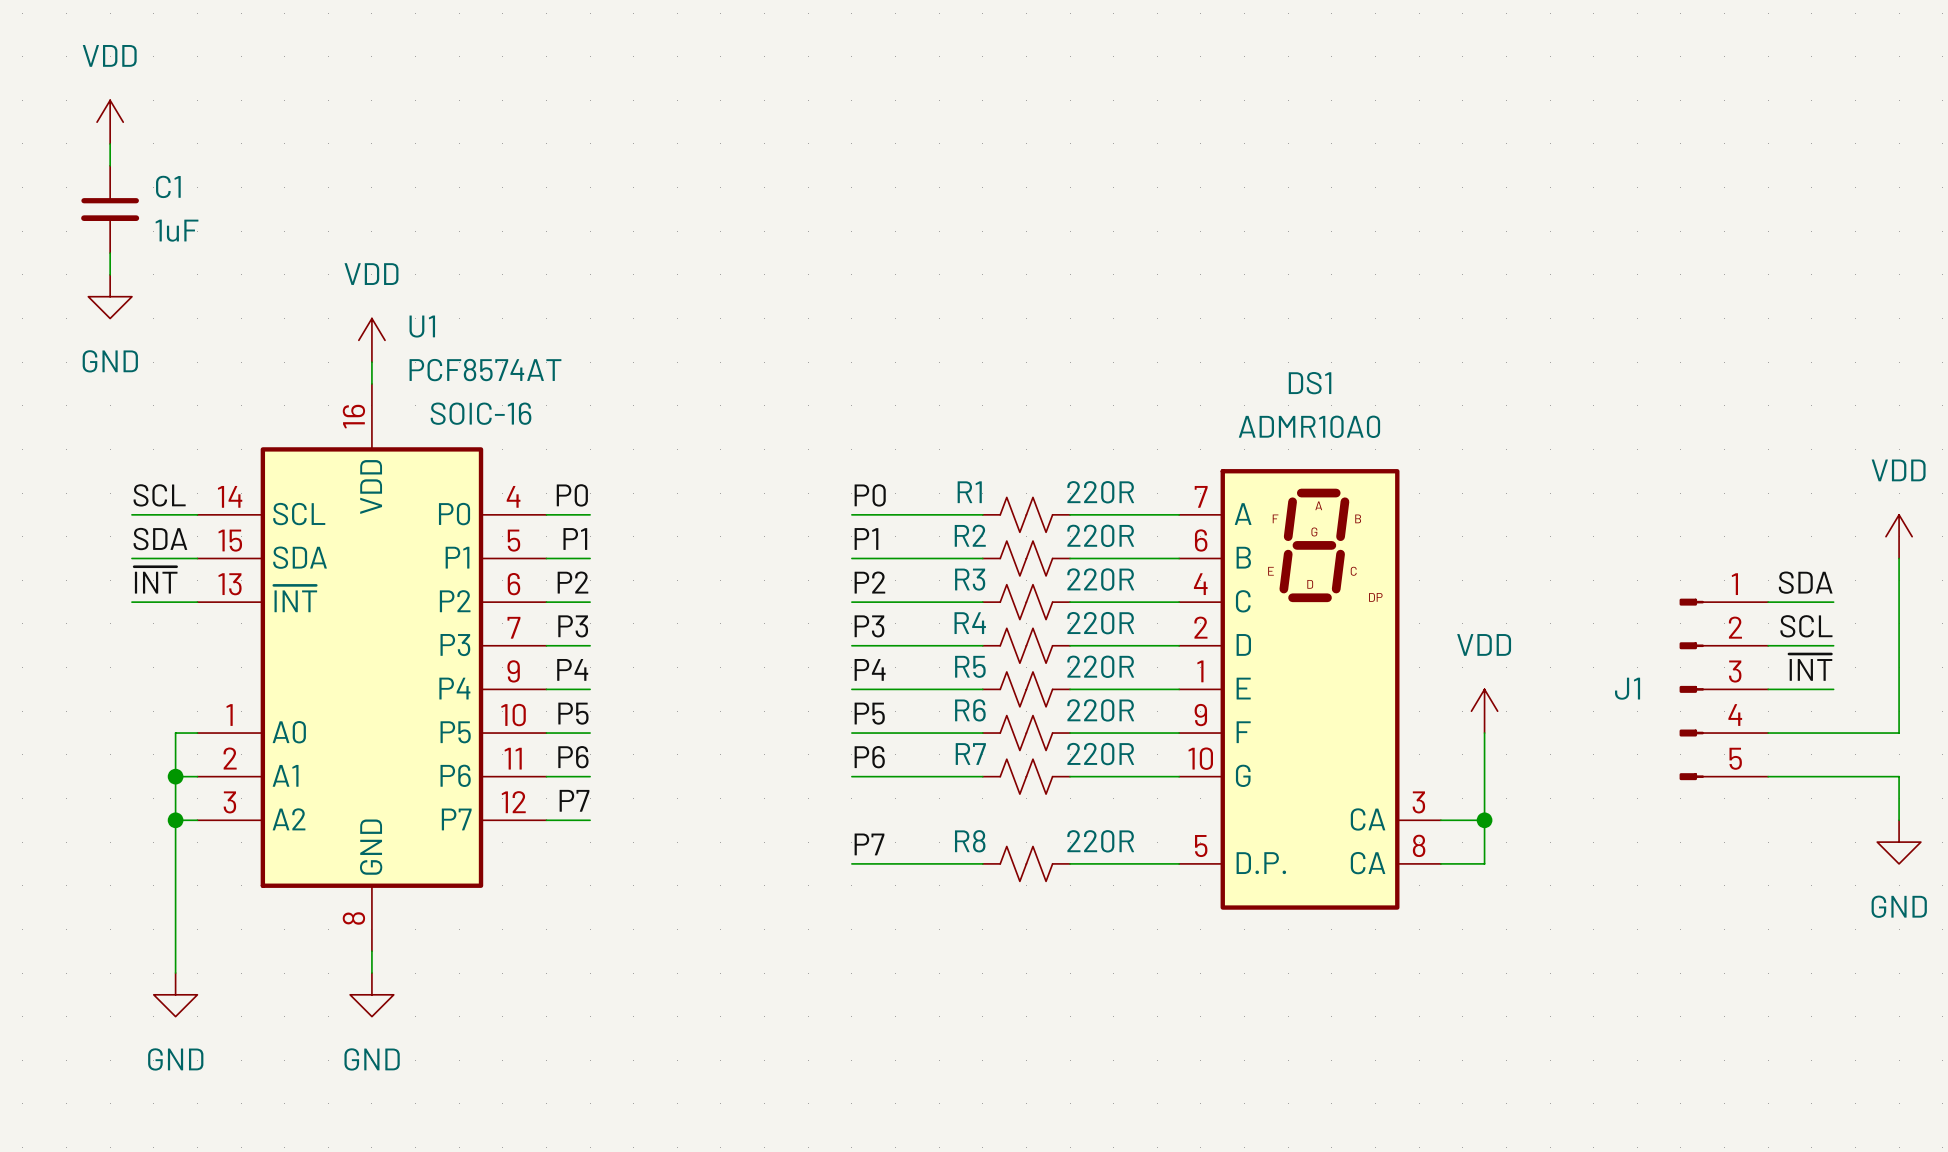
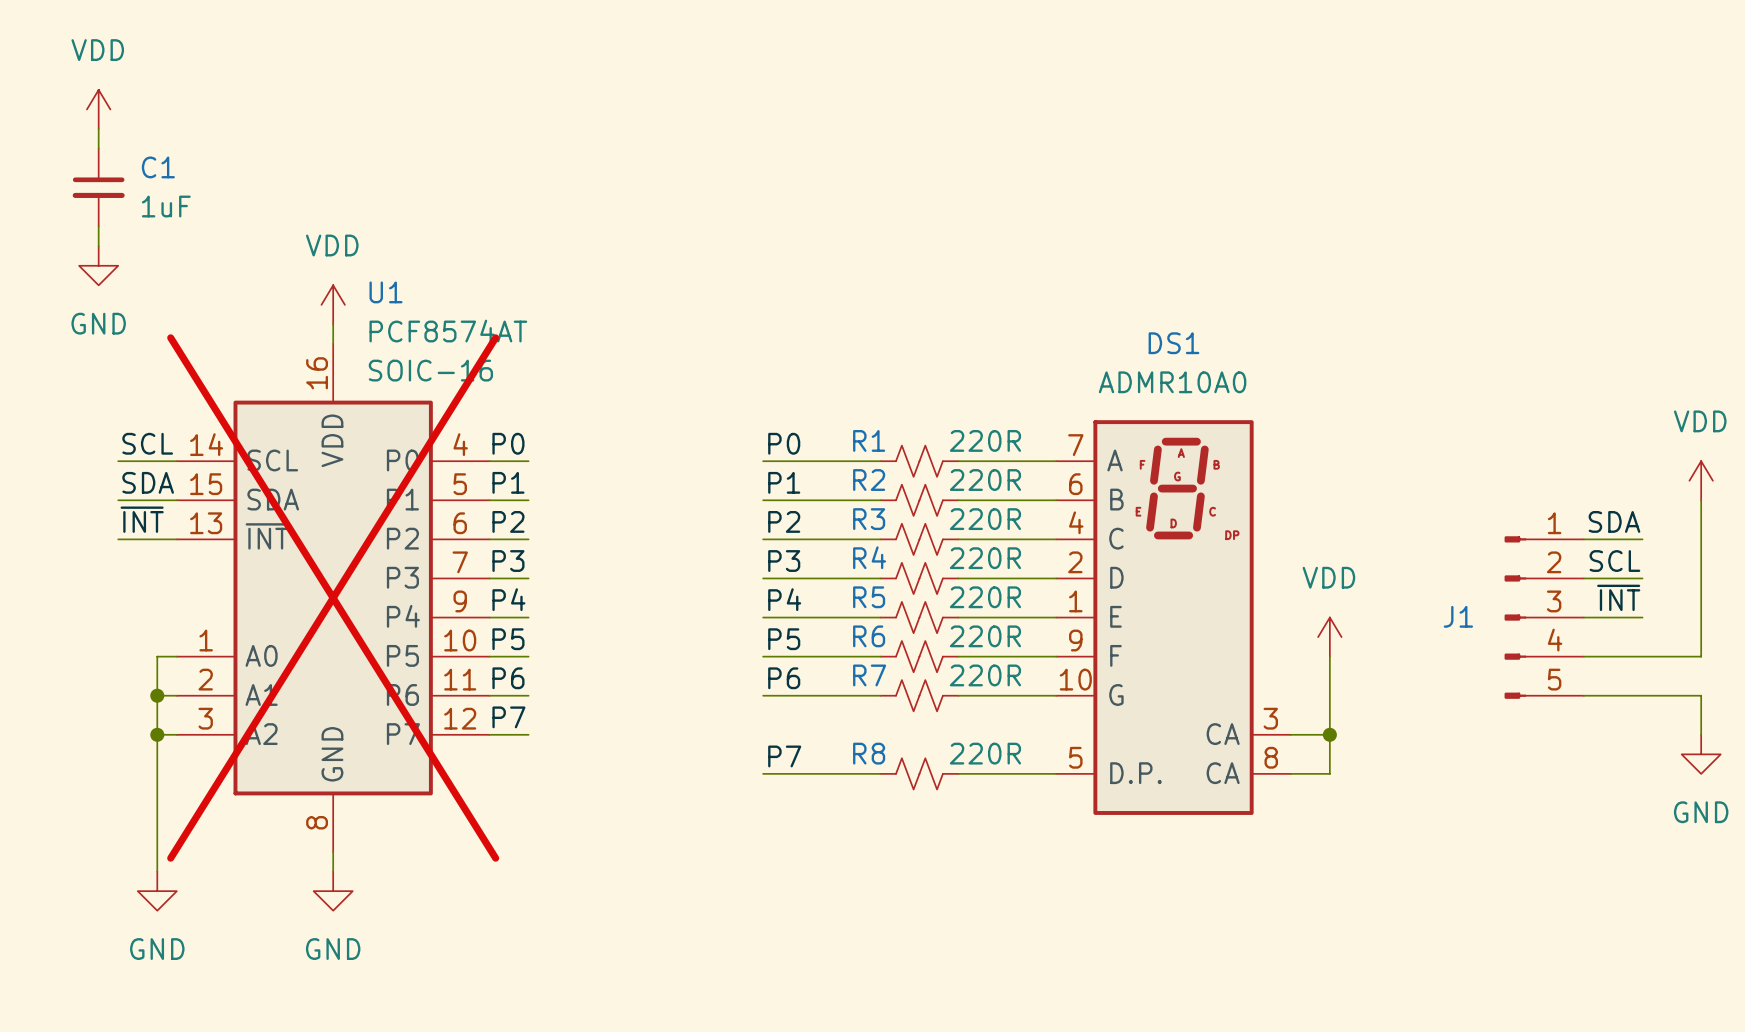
U1 do-not-place cross: none -> (333, 598)

